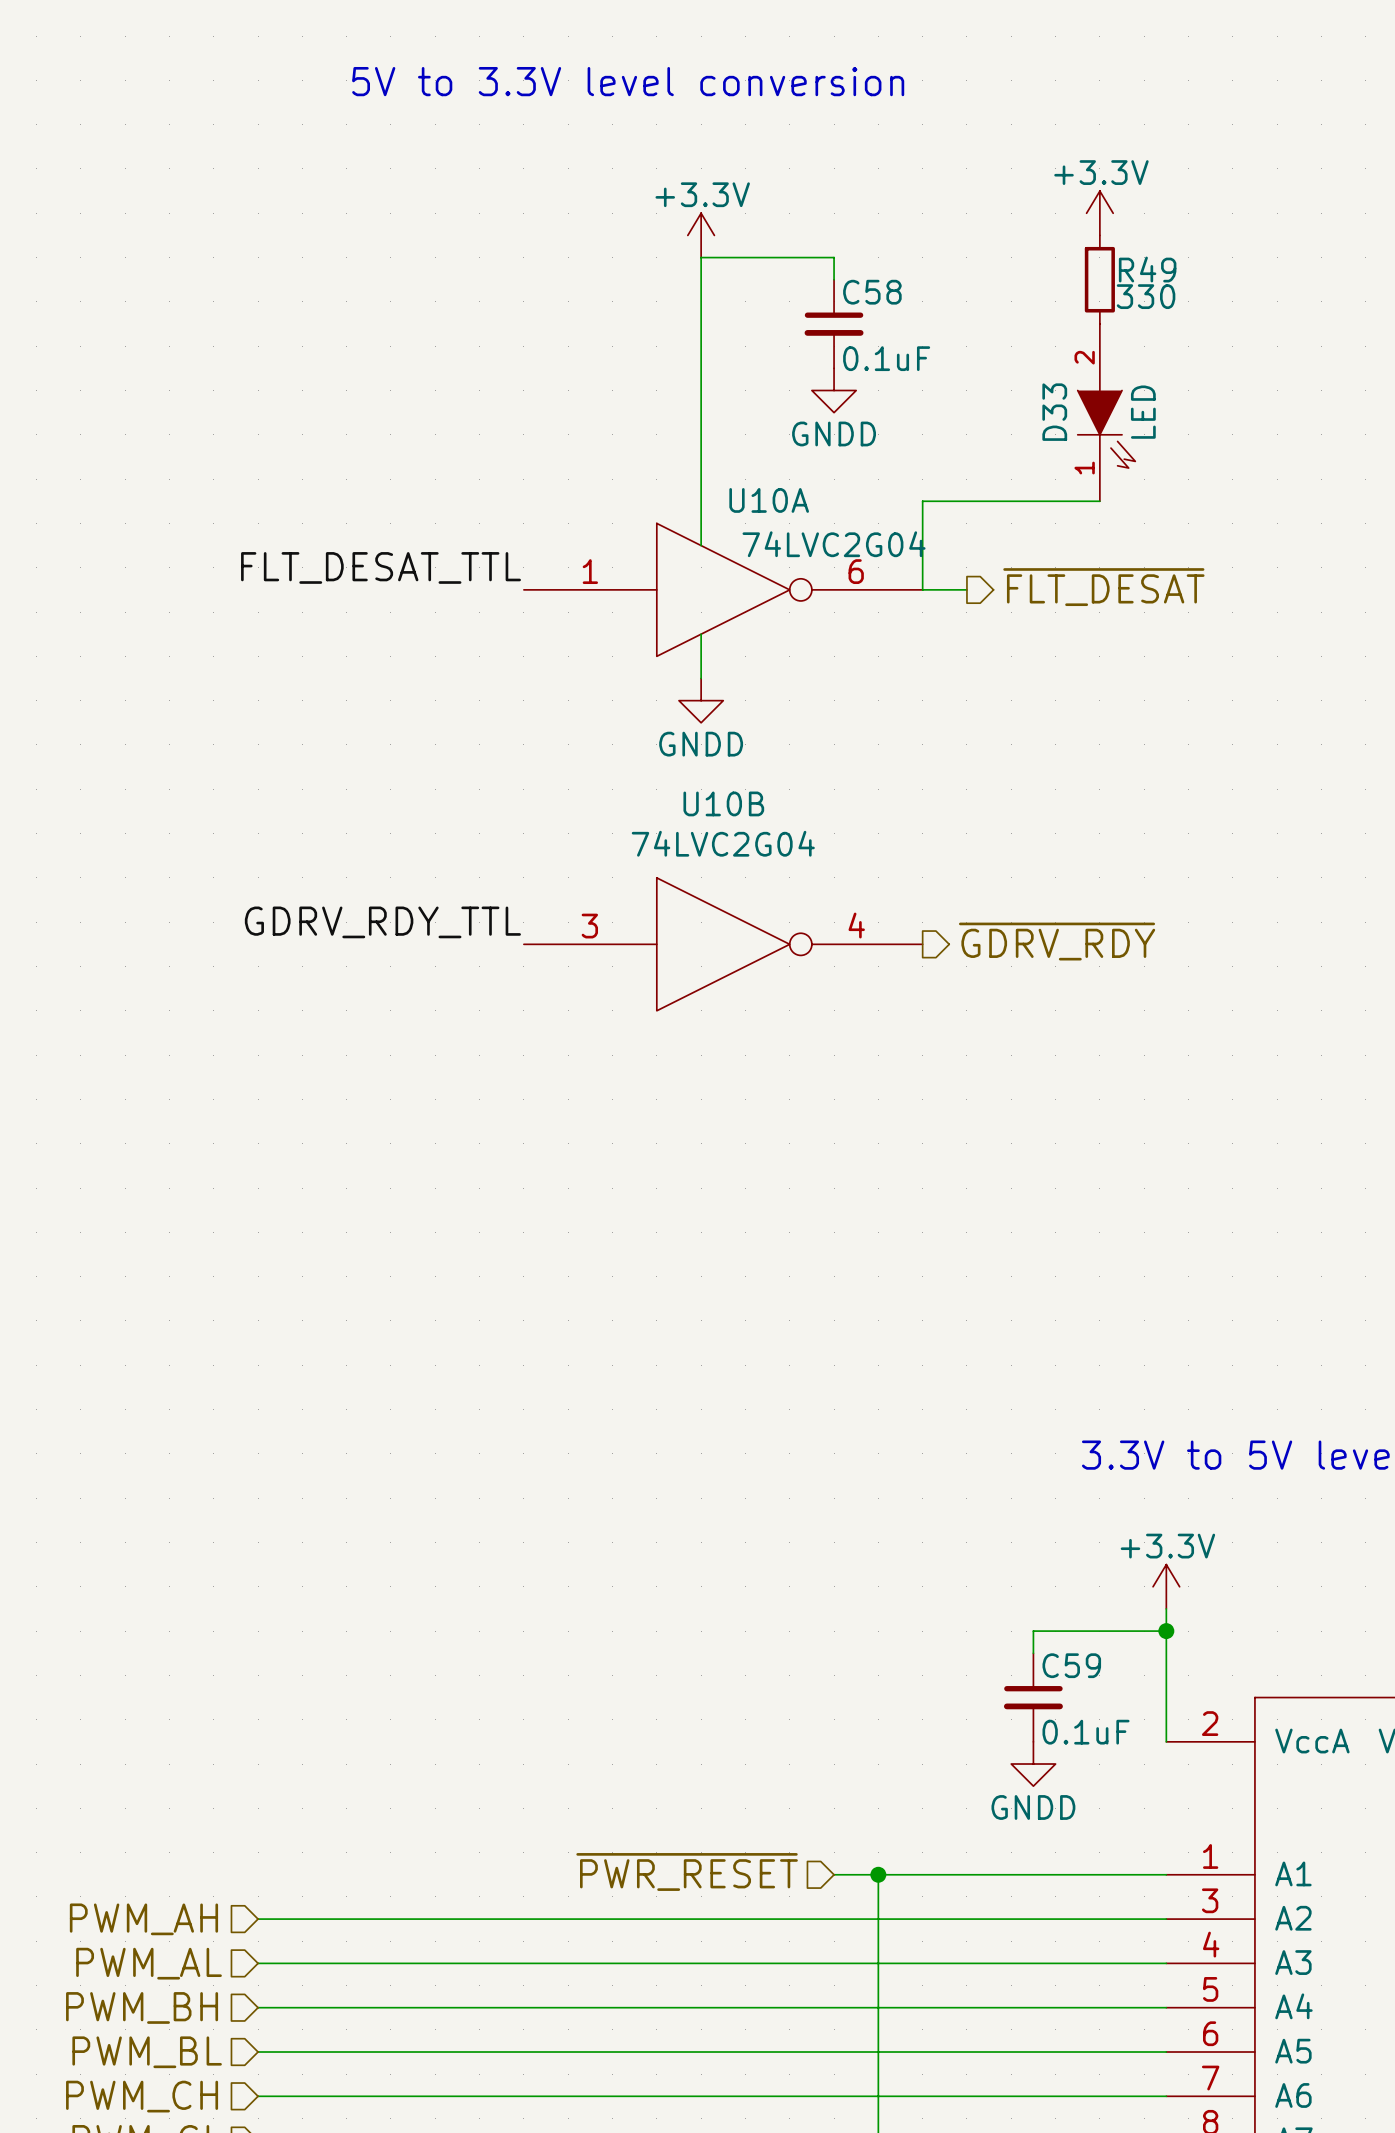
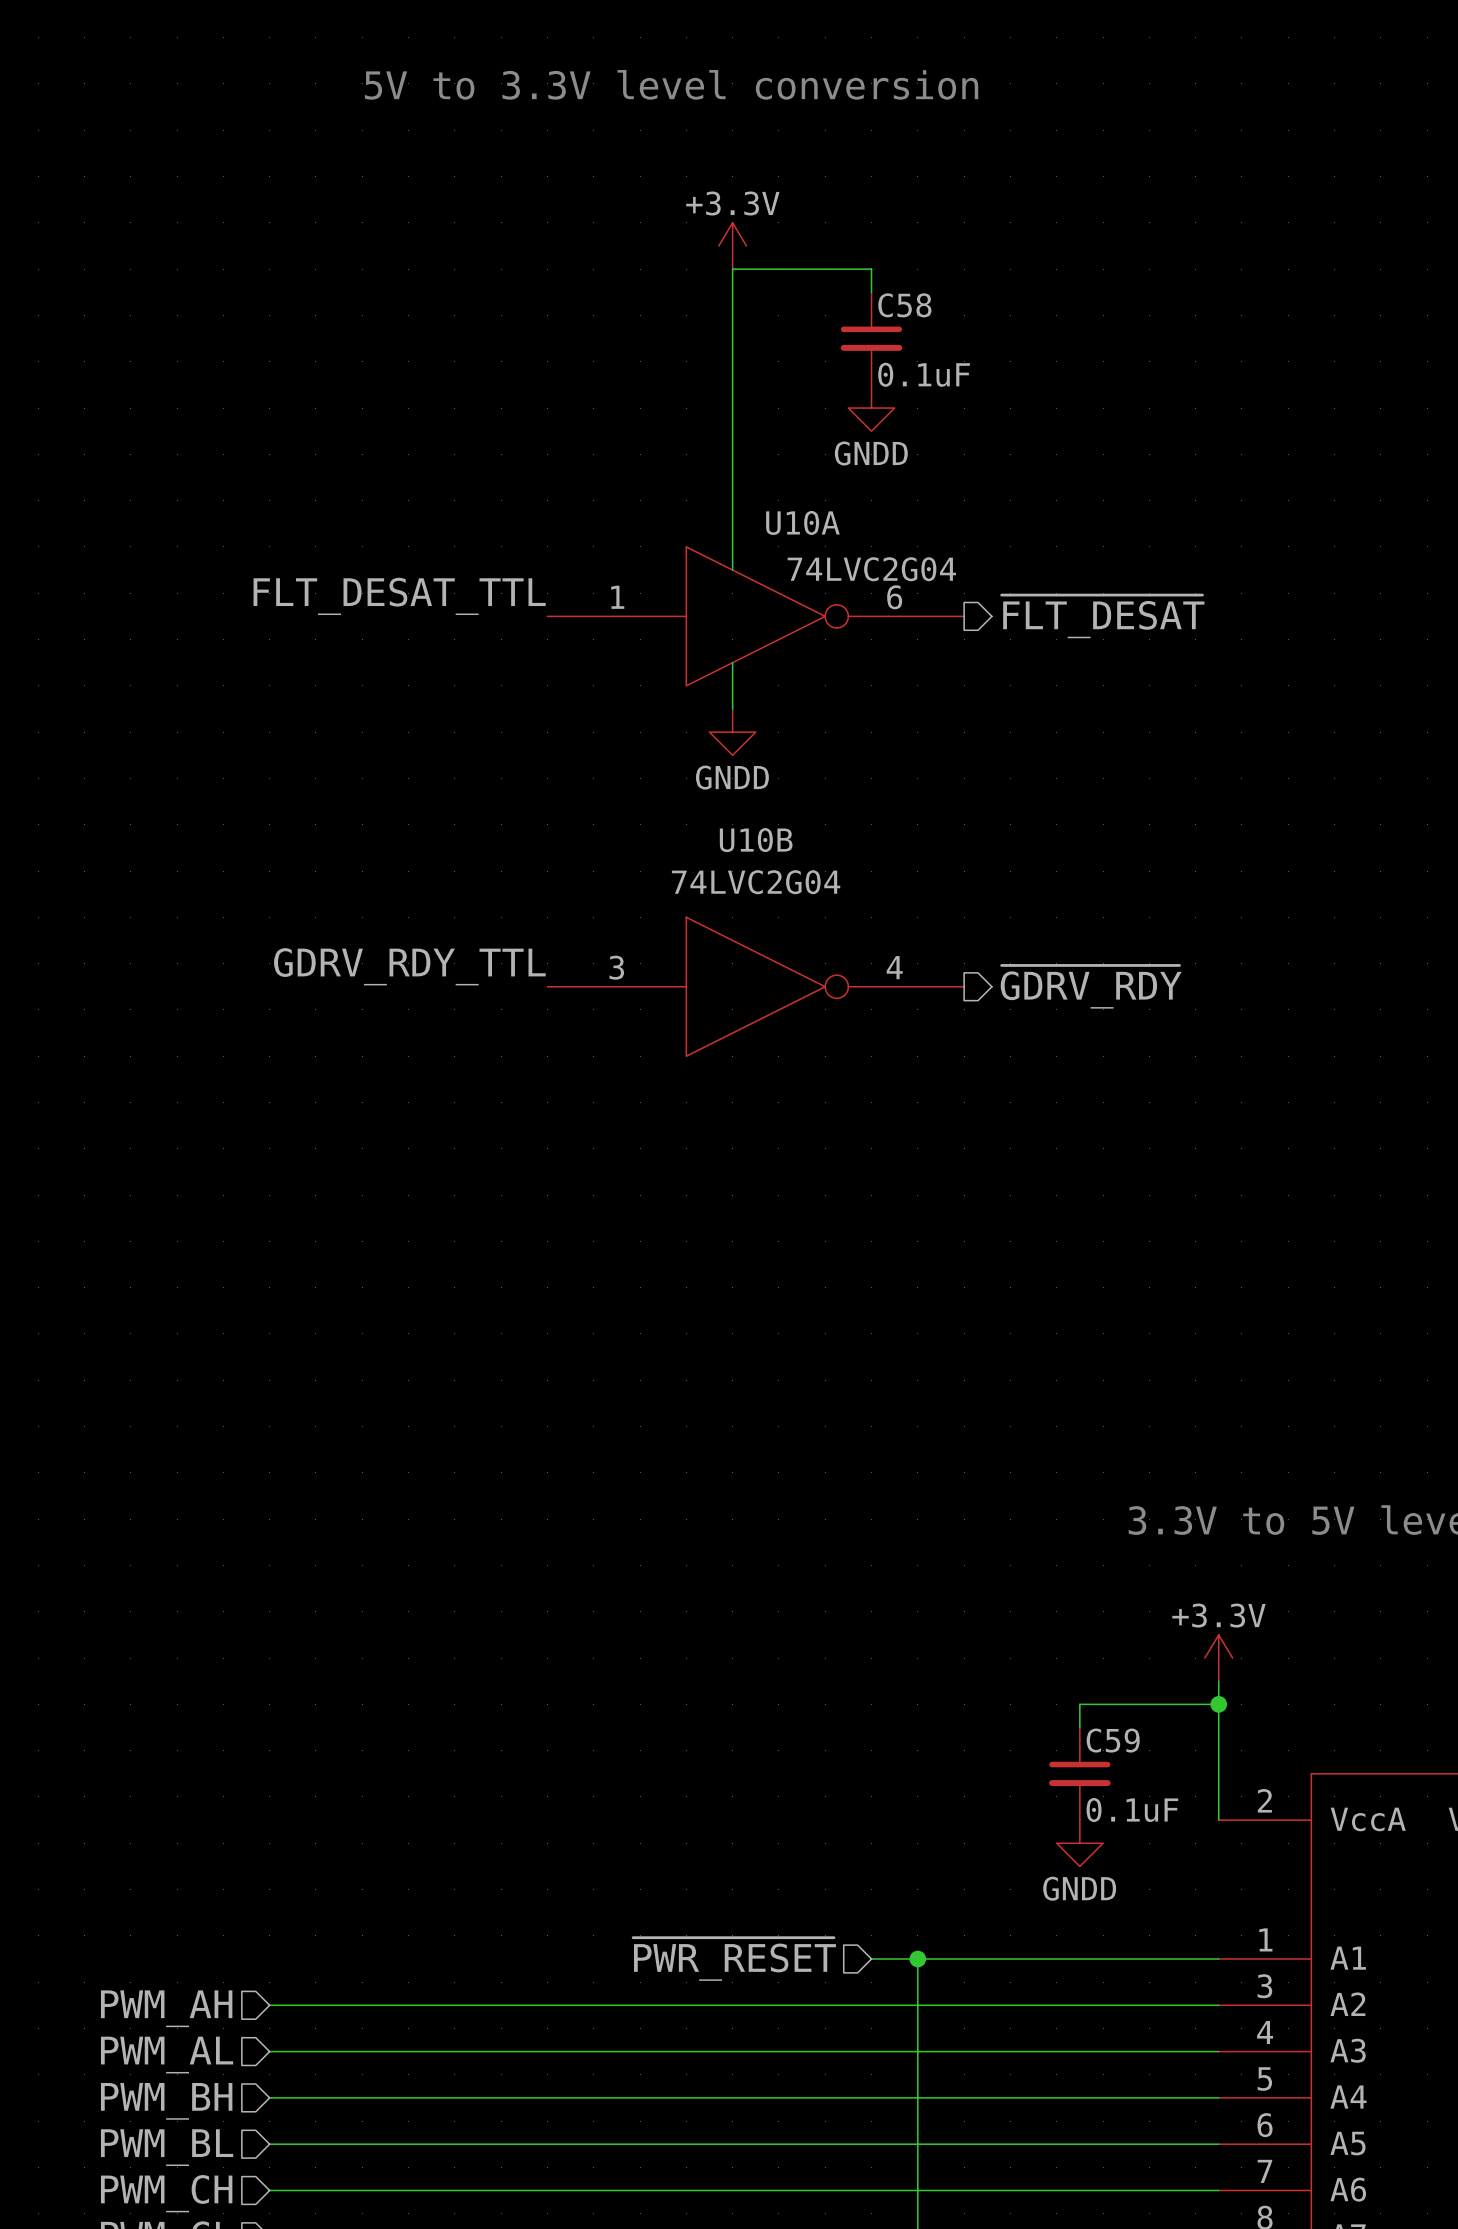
power symbol: +3.3V (1099, 213) -> none
R49: 330 (1099, 279) -> none
D33: LED (1106, 412) -> none
wire: (1099, 501) (922, 501) (922, 589) (966, 589) -> none
hierarchical label position: ~{FLT_DESAT} (1103, 587) -> ~{FLT_DESAT} (1103, 616)

